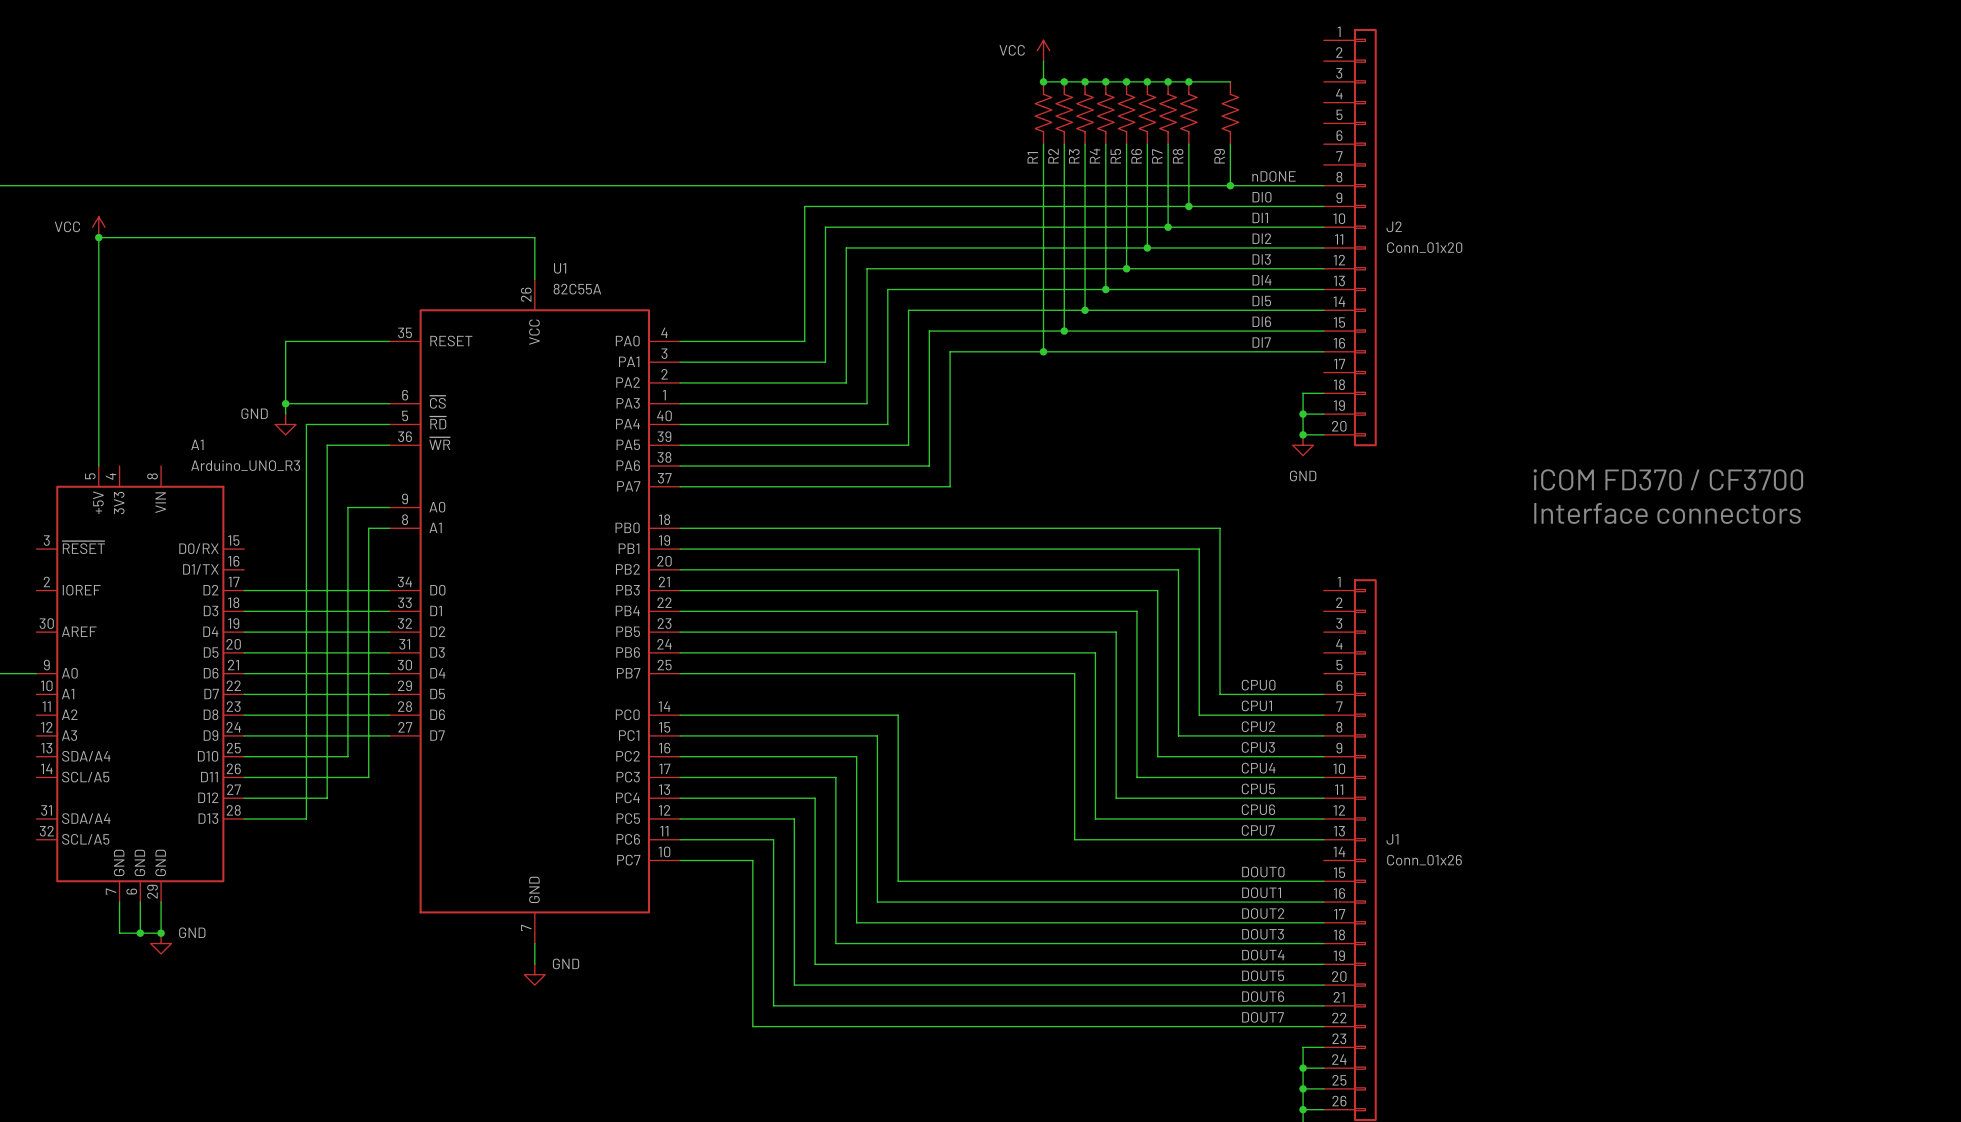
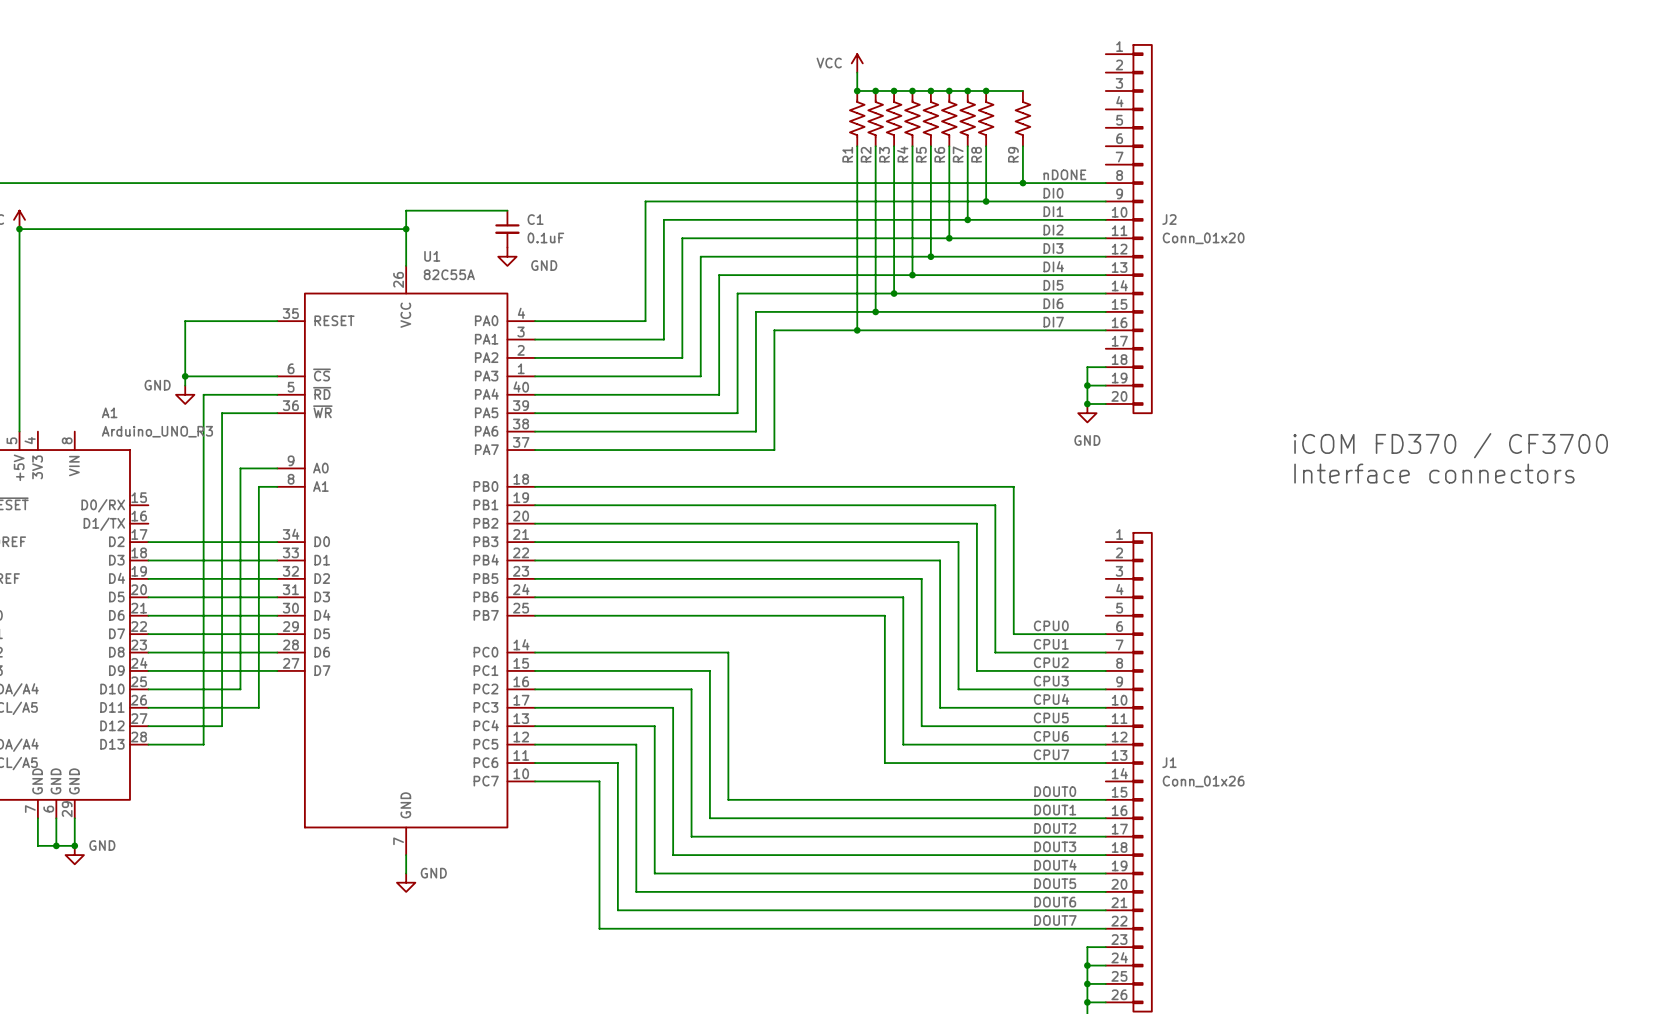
wire: none -> (507, 210) (406, 210) (406, 229)
junction: none -> (406, 229)
C1: none -> 0.1uF (507, 229)
power symbol: none -> GND (507, 256)

